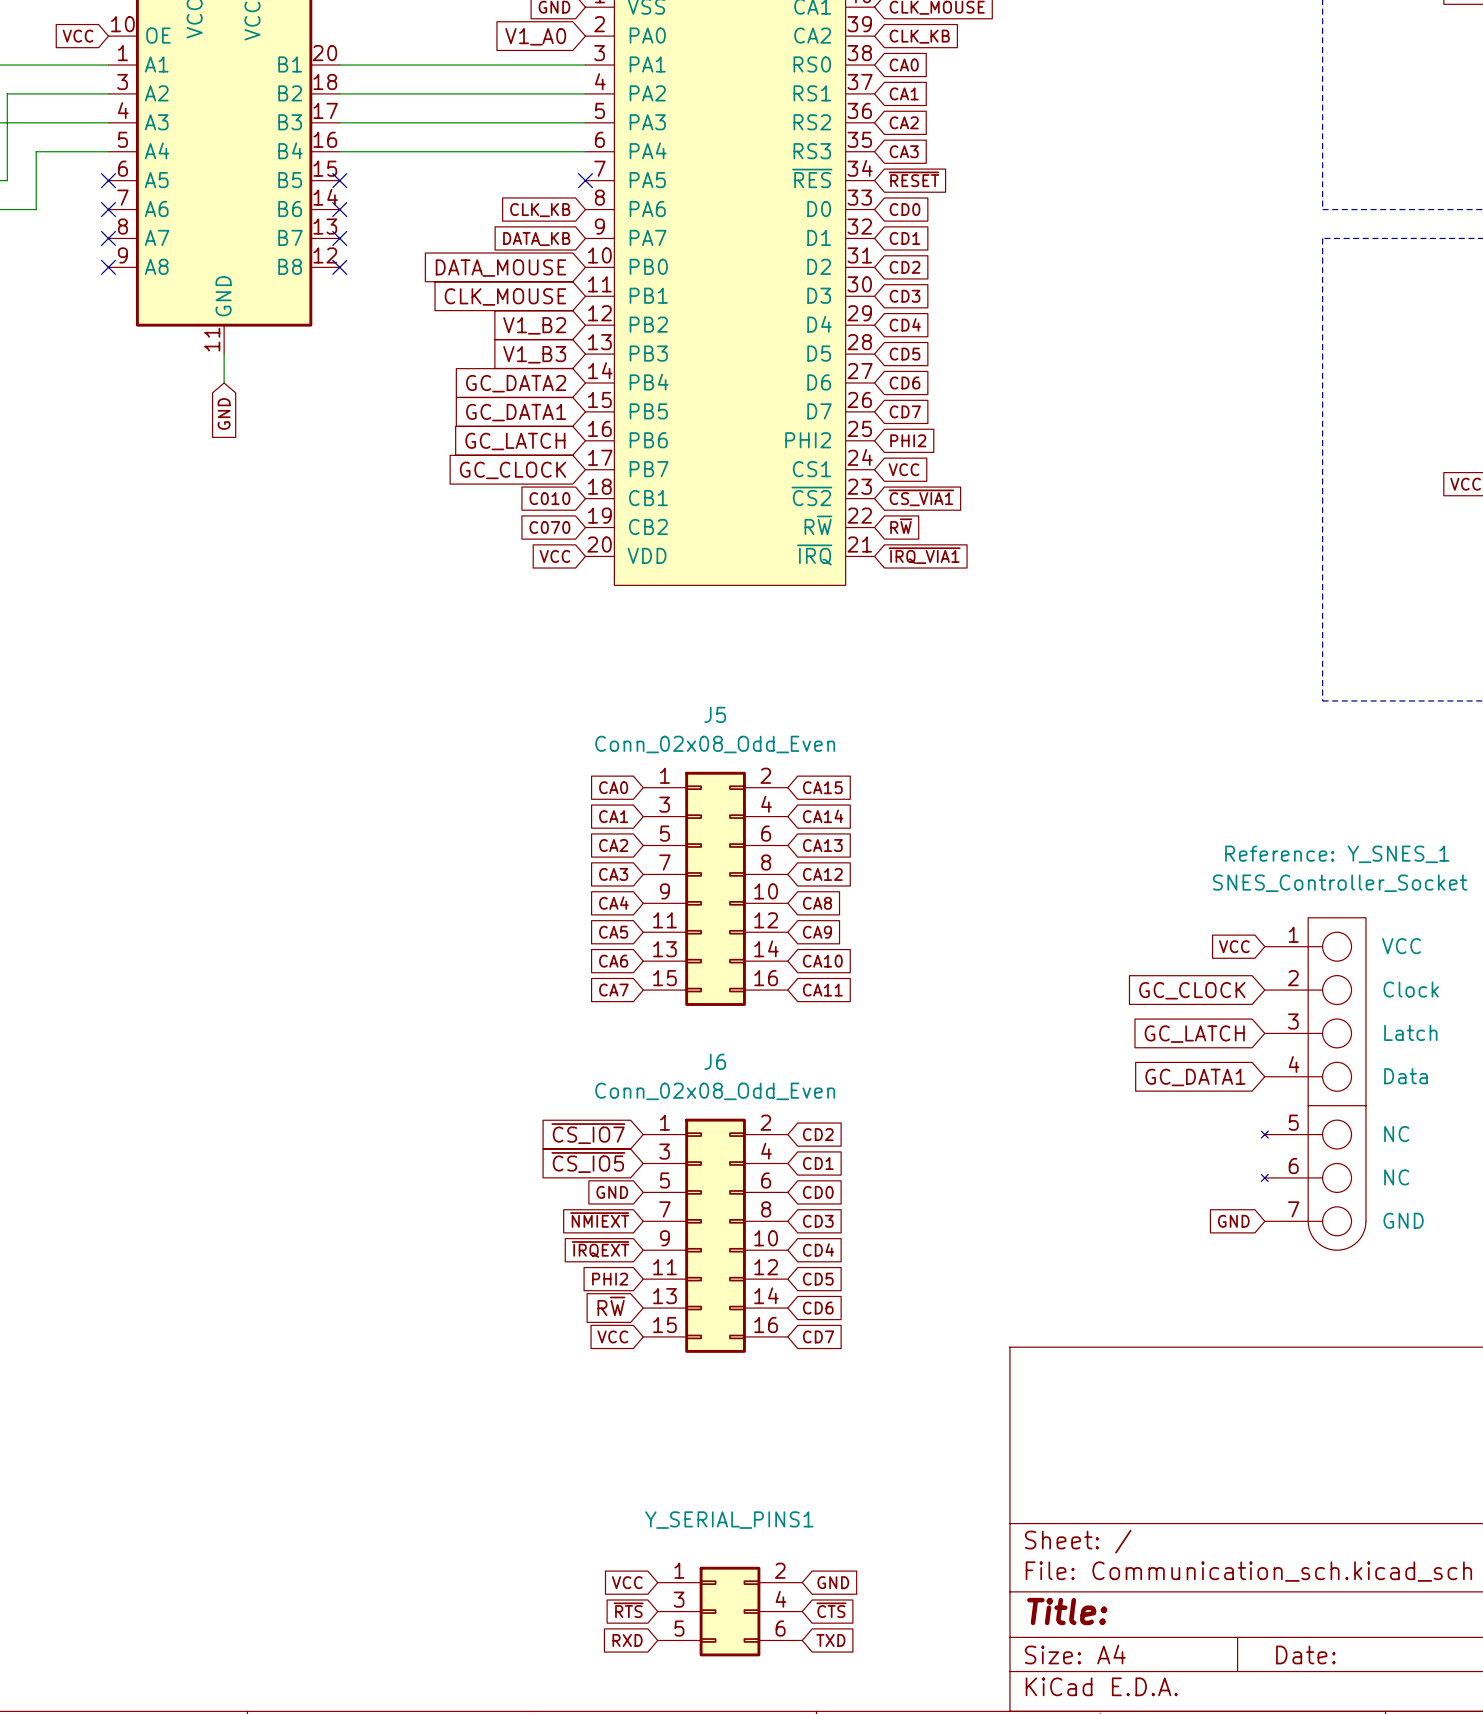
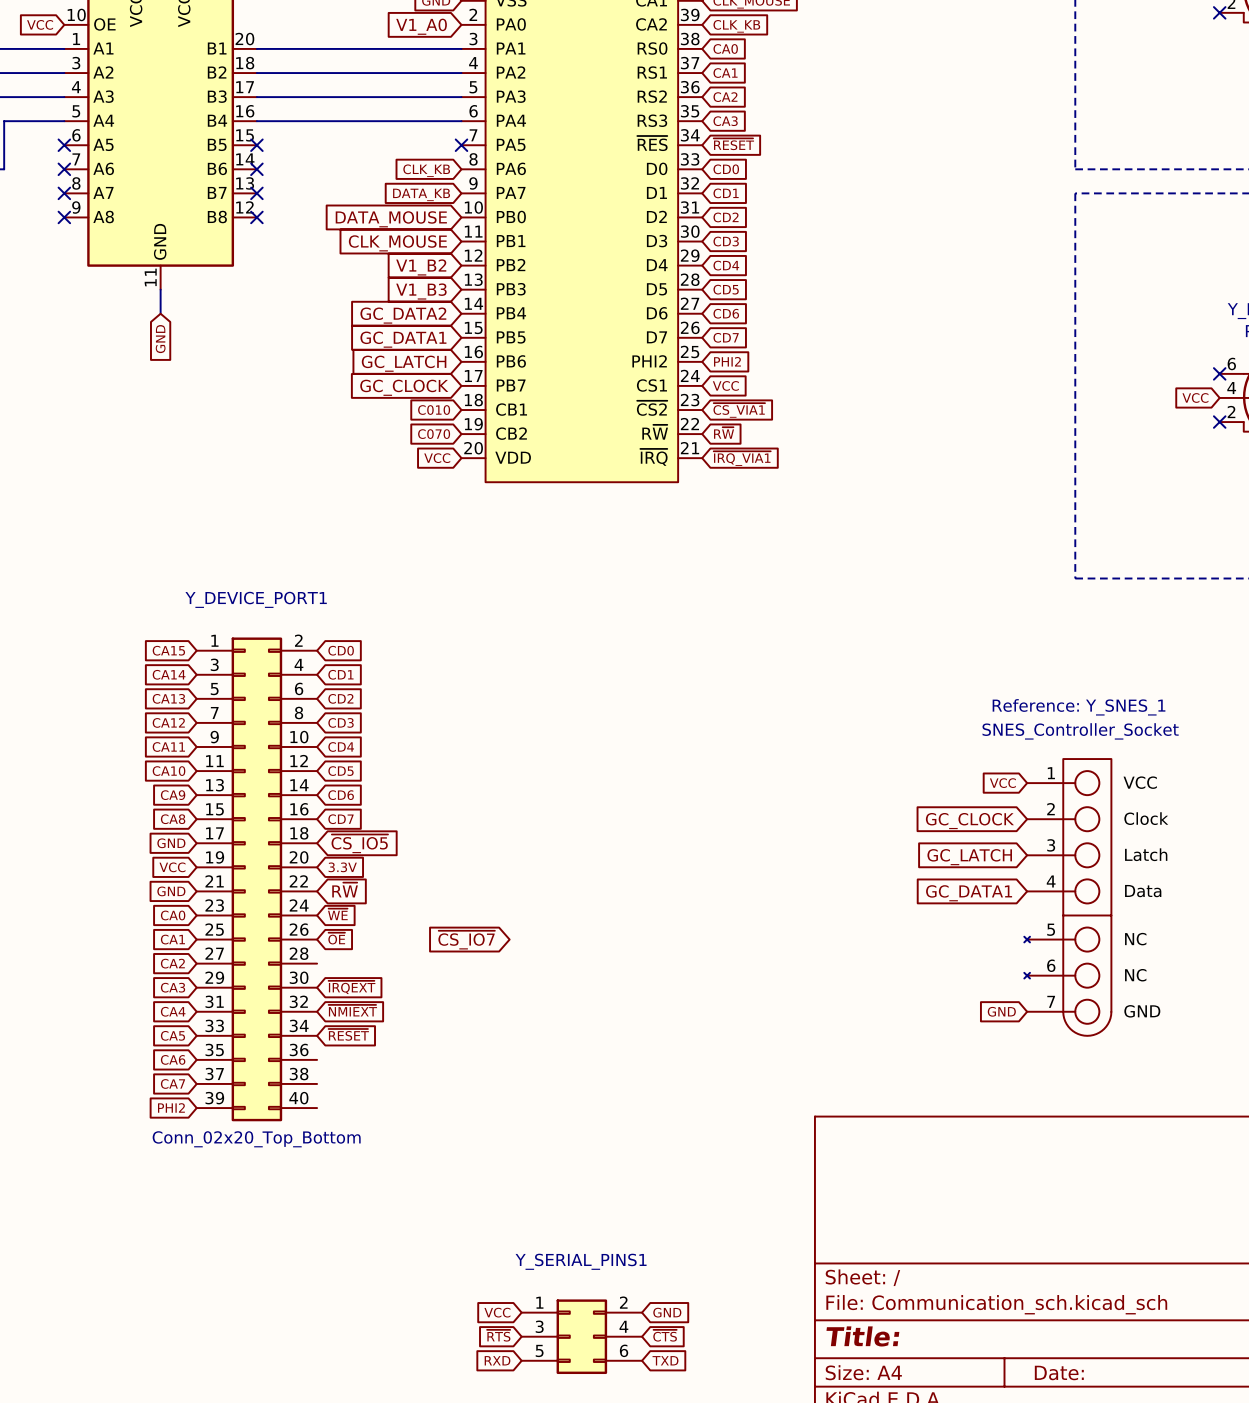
global label: none -> CA15 (168, 650)
global label: none -> CD0 (341, 650)
global label: CA0 (613, 787) -> none
global label: CA15 (822, 787) -> none
global label: none -> CA14 (169, 674)
global label: none -> CD1 (340, 674)
global label: CA1 (613, 816) -> none
global label: CA14 (823, 816) -> none
global label: none -> CA13 (168, 698)
global label: none -> CD2 (340, 698)
global label: CA2 (613, 845) -> none
global label: CA13 (822, 845) -> none
global label: none -> CA12 (168, 722)
global label: none -> CD3 (341, 722)
global label: CA3 (613, 874) -> none
global label: CA12 (822, 874) -> none
J5: Conn_02x08_Odd_Even (715, 888) -> none
global label: none -> CA11 (168, 747)
global label: none -> CD4 (341, 747)
global label: CA4 (613, 903) -> none
global label: CA8 (817, 903) -> none
global label: none -> CA10 (169, 771)
global label: none -> CD5 (340, 771)
global label: CA5 (613, 932) -> none
global label: CA9 (817, 932) -> none
global label: none -> CA9 (173, 795)
global label: none -> CD6 (341, 795)
global label: CA6 (613, 961) -> none
global label: CA10 (822, 961) -> none
global label: none -> CA8 (173, 819)
global label: none -> CD7 (341, 819)
global label: CA7 (613, 990) -> none
global label: CA11 (822, 990) -> none
global label: none -> GND (171, 843)
global label: none -> VCC (172, 867)
global label: none -> 3.3V (342, 867)
Y_DEVICE_PORT1: none -> Conn_02x20_Top_Bottom (256, 879)
global label: none -> R~{W} (345, 890)
global label: none -> GND (171, 891)
global label: none -> ~{WE} (337, 914)
global label: none -> CA0 (173, 915)
global label: none -> ~{OE} (336, 938)
global label: none -> CA1 (172, 939)
global label: CD2 (818, 1134) -> none
global label rotation: 0° (588, 1162) -> 180° (359, 843)
global label: none -> CA2 (172, 963)
global label: CD1 (818, 1163) -> none
global label: none -> CA3 (173, 987)
global label: GND (612, 1192) -> none
global label: CD0 (818, 1192) -> none
global label rotation: 0° (599, 1220) -> 180° (352, 1010)
global label: none -> CA4 (173, 1011)
global label: CD3 (818, 1221) -> none
J6: Conn_02x08_Odd_Even (715, 1235) -> none
global label: none -> ~{RESET} (348, 1034)
global label rotation: 0° (600, 1249) -> 180° (351, 987)
global label: CD4 (818, 1249) -> none
global label: none -> CA5 (172, 1035)
global label: none -> CA6 (173, 1059)
global label: PHI2 (610, 1279) -> none
global label: CD5 (818, 1279) -> none
global label: R~{W} (611, 1306) -> none
global label: none -> CA7 (172, 1083)
global label: CD6 (818, 1308) -> none
global label: none -> PHI2 (171, 1107)
global label: VCC (612, 1336) -> none
global label: CD7 (818, 1336) -> none

